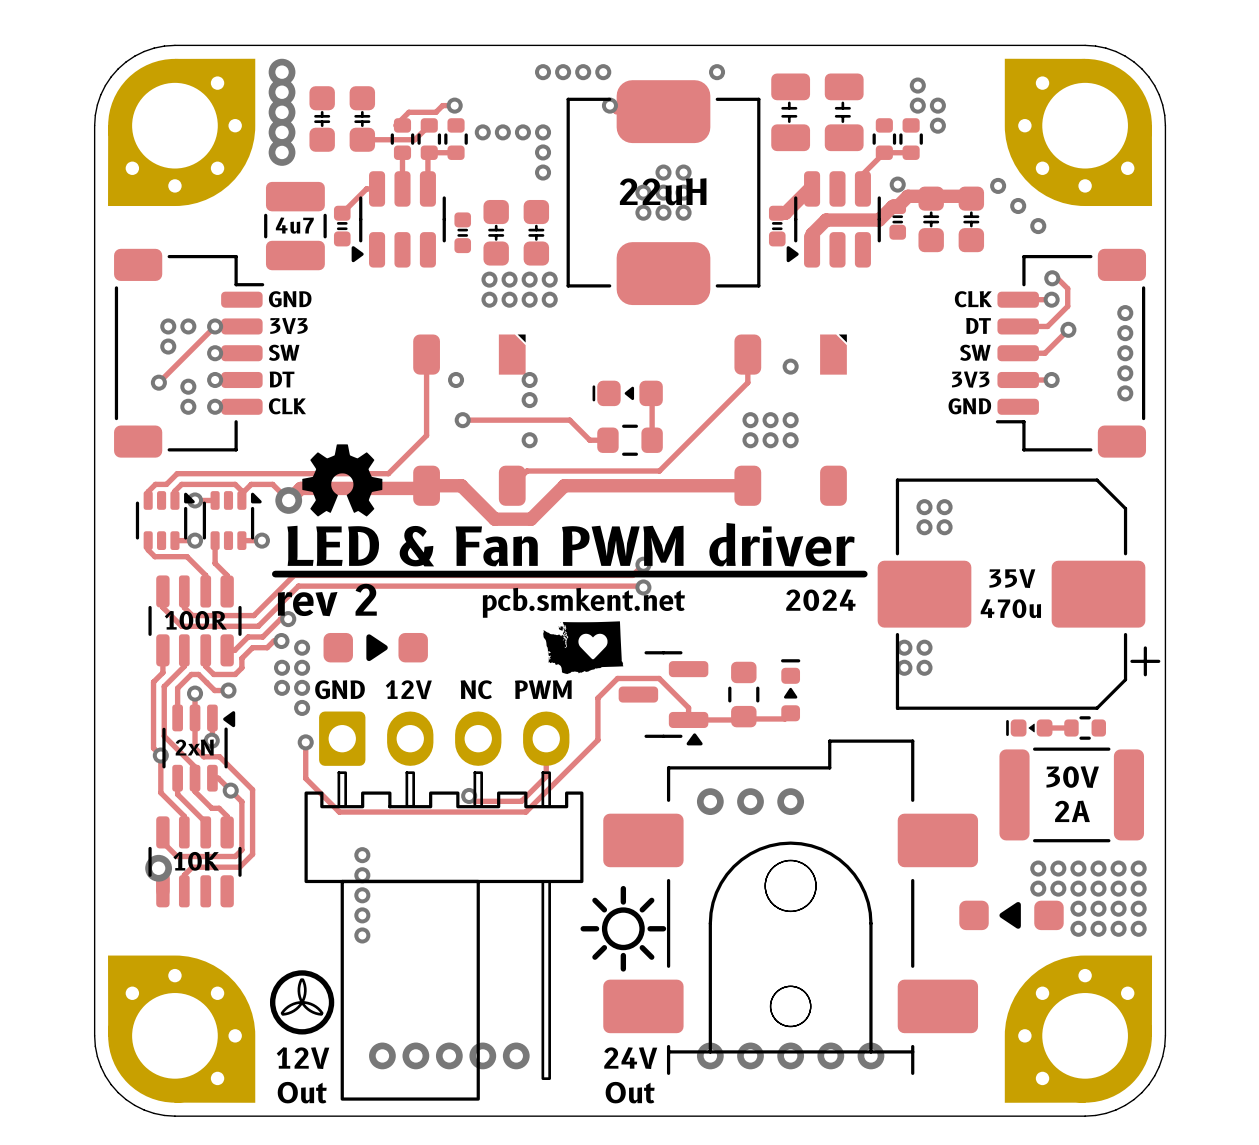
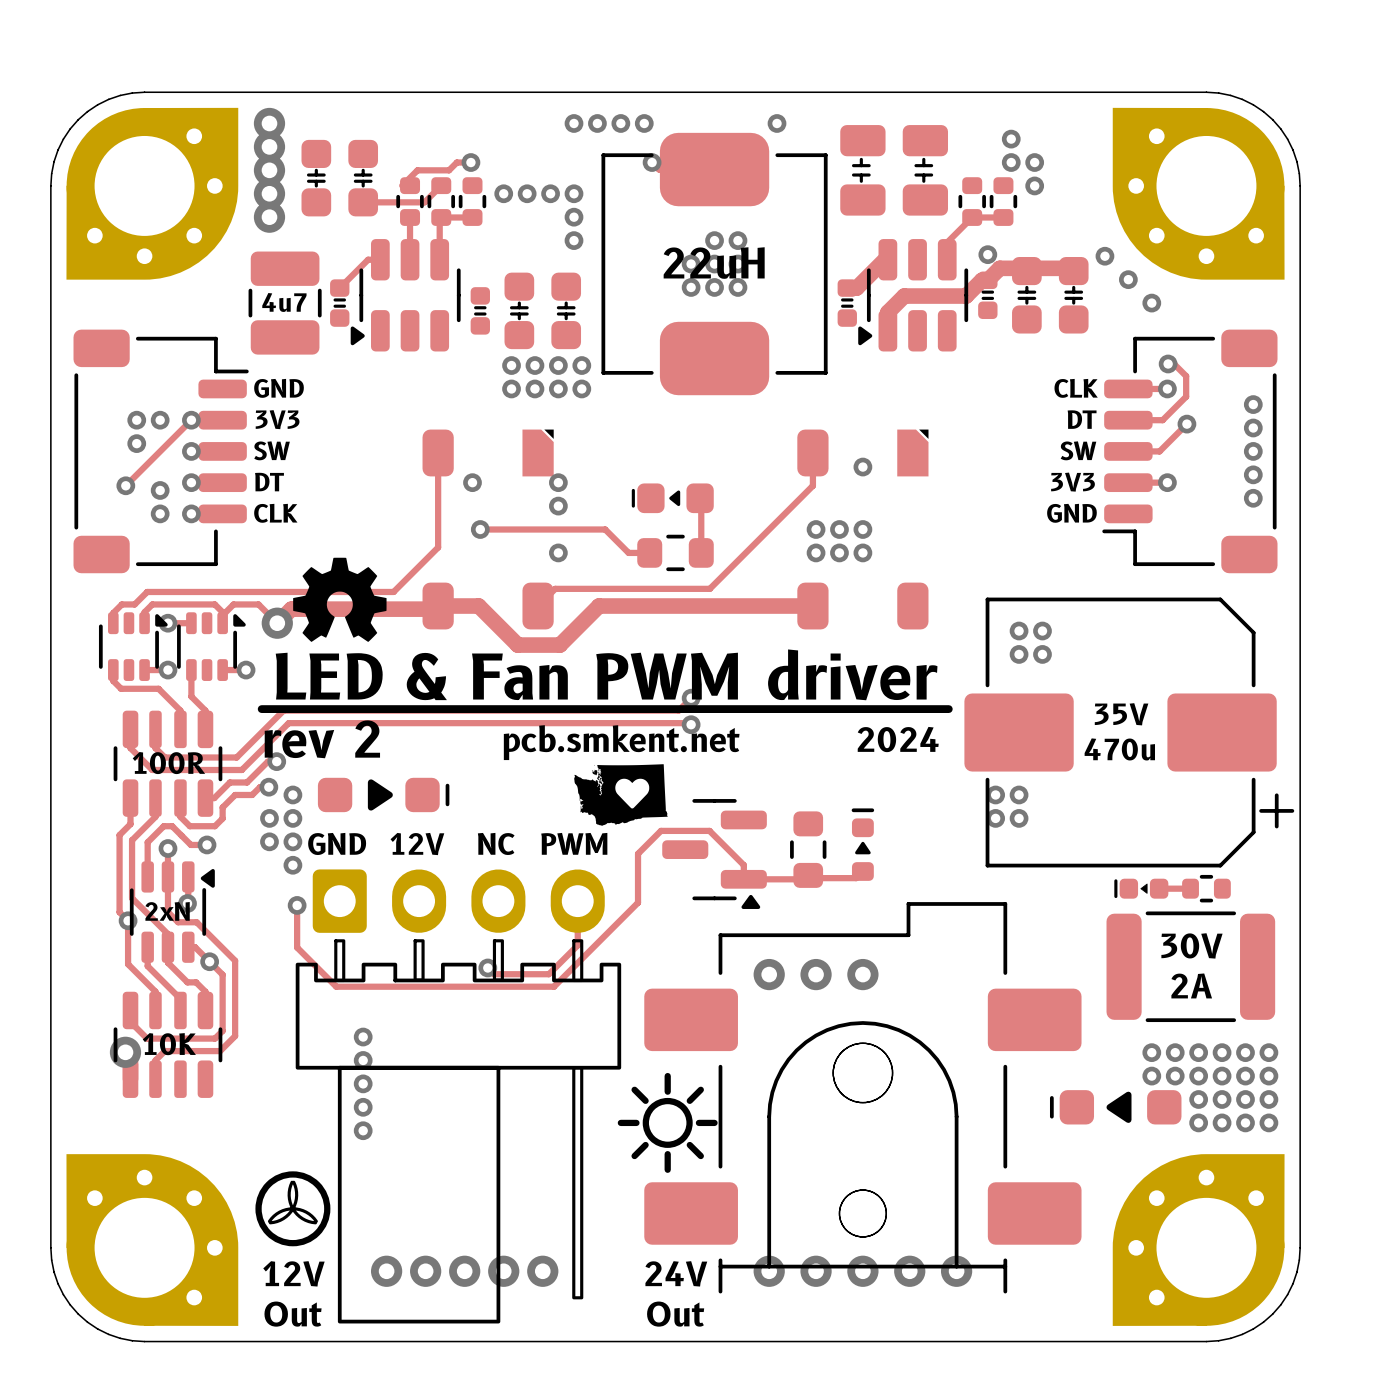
part footprint: [323, 632, 428, 663] -> [317, 777, 450, 813]
part footprint: [959, 900, 1064, 931] -> [1049, 1090, 1182, 1125]

